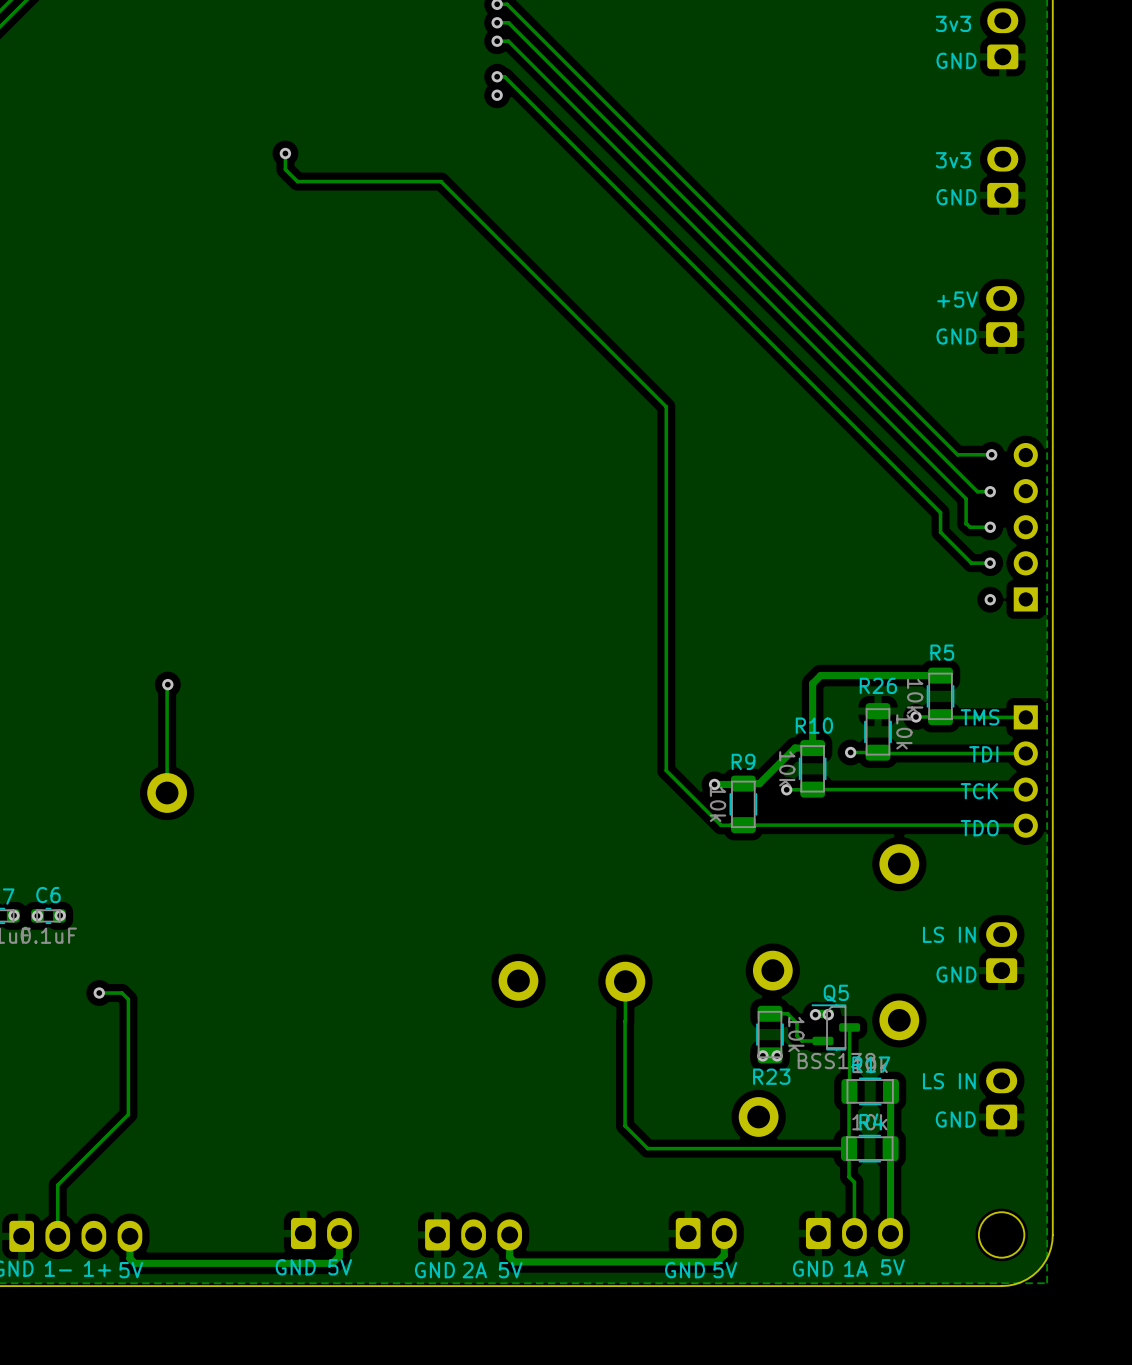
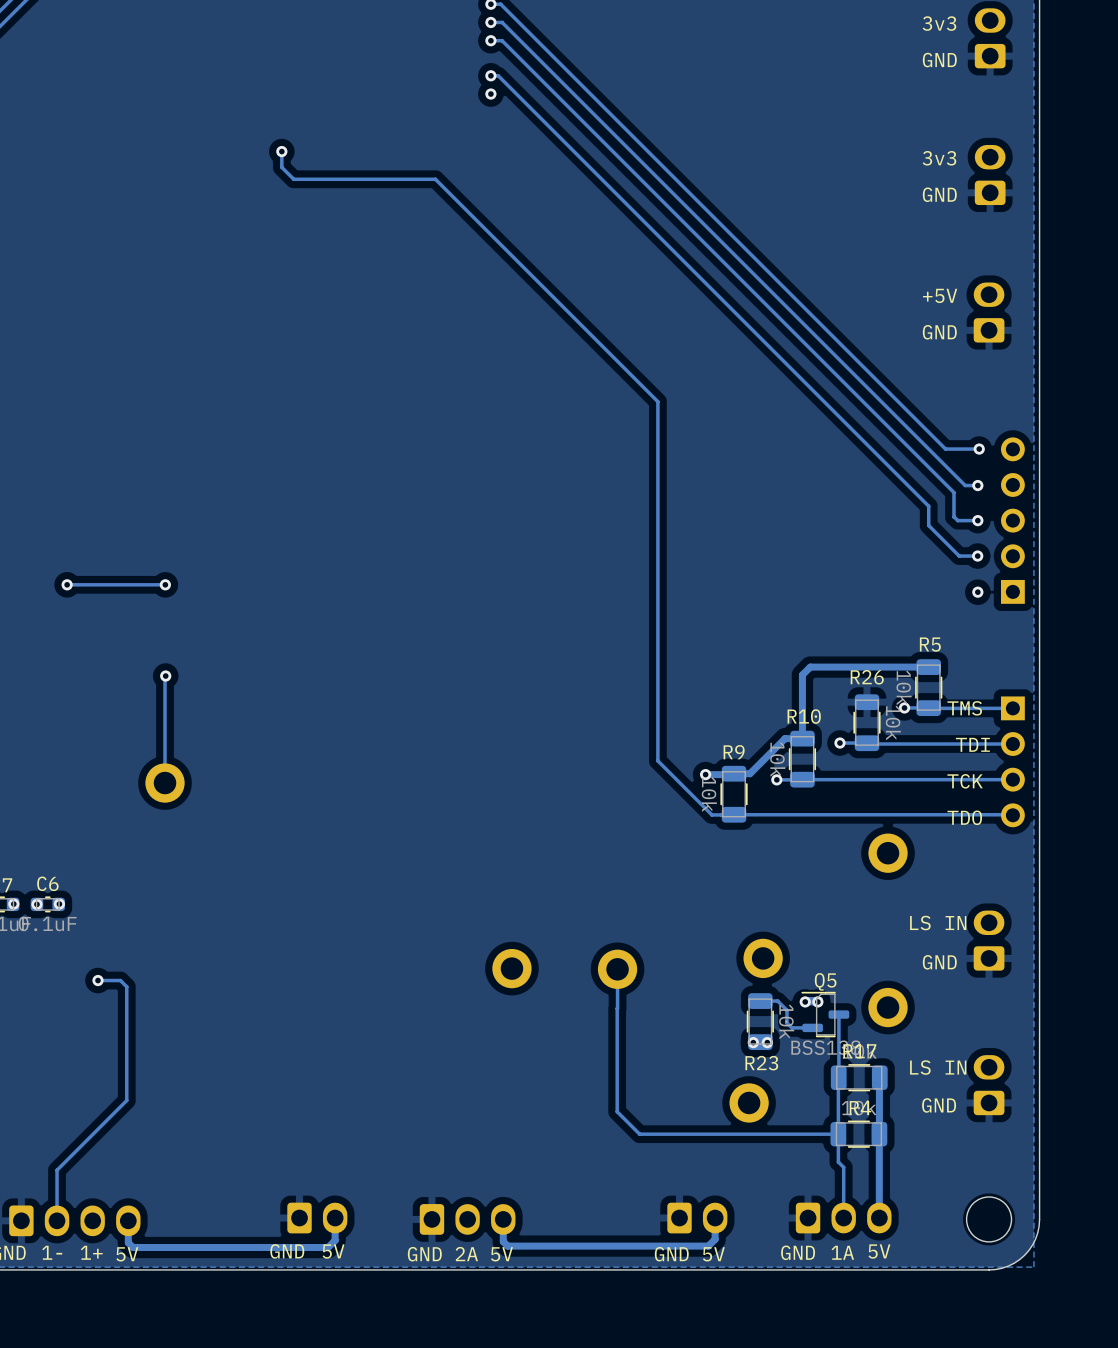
via: none -> (67, 584)
track: none -> (165, 584) (67, 584)
via: none -> (165, 584)

